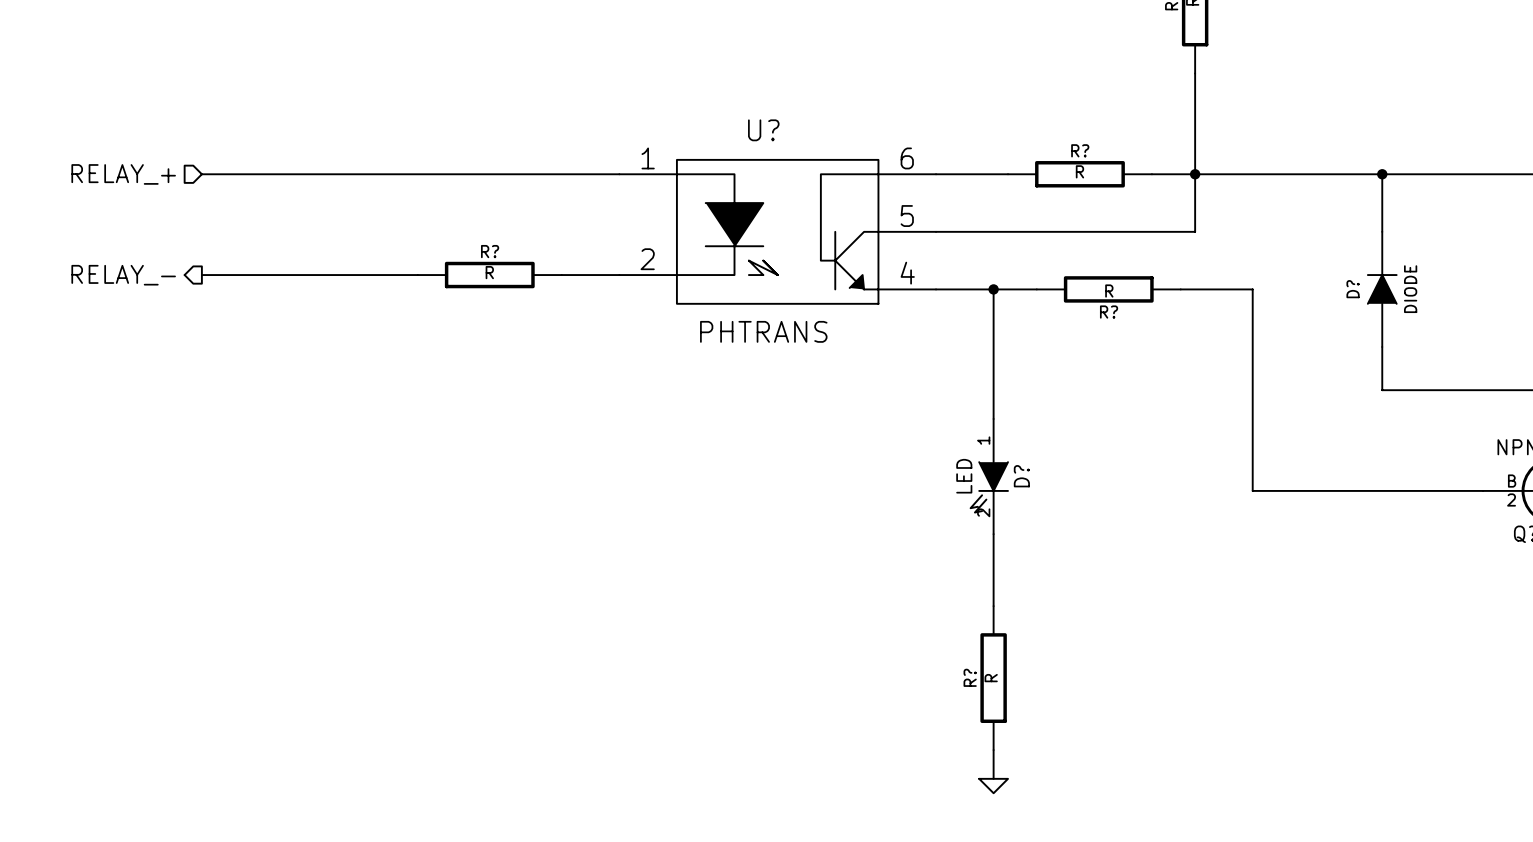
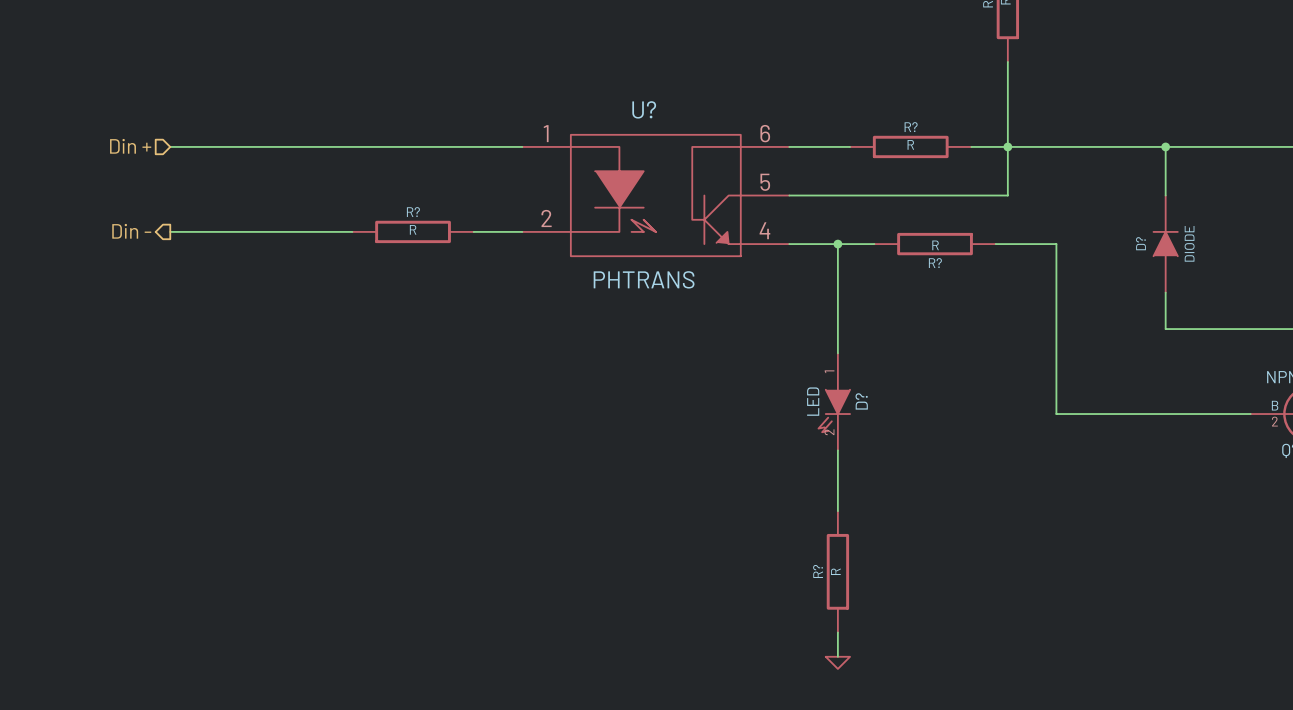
hierarchical label: RELAY_+ (123, 174) -> Din + (130, 146)
hierarchical label: RELAY_- (123, 275) -> Din - (131, 231)

